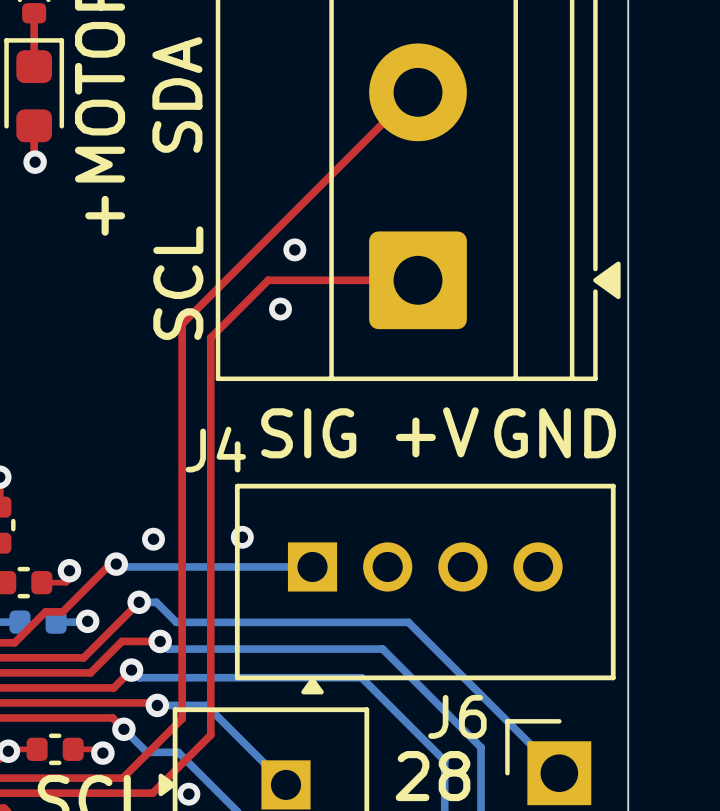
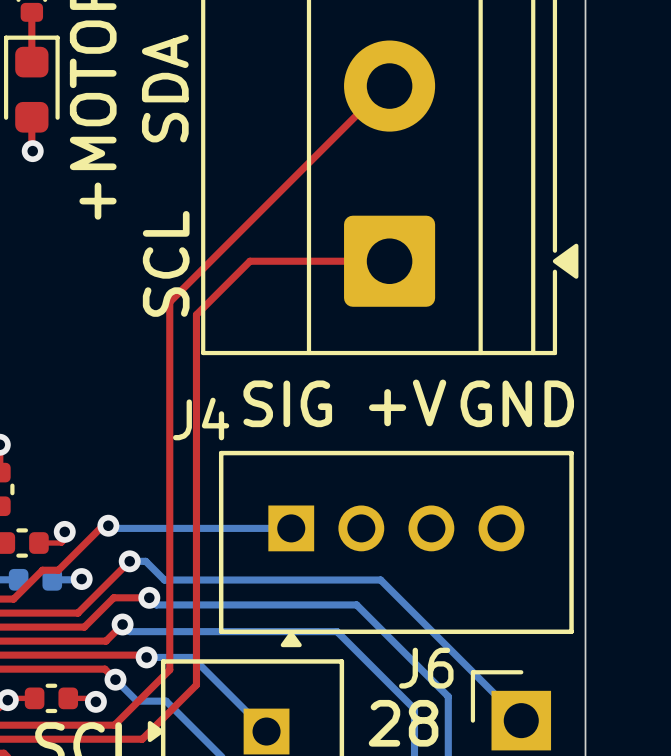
via: (294, 249) -> none
via: (280, 309) -> none
via: (242, 537) -> none
via: (153, 539) -> none
via: (188, 794) -> none

